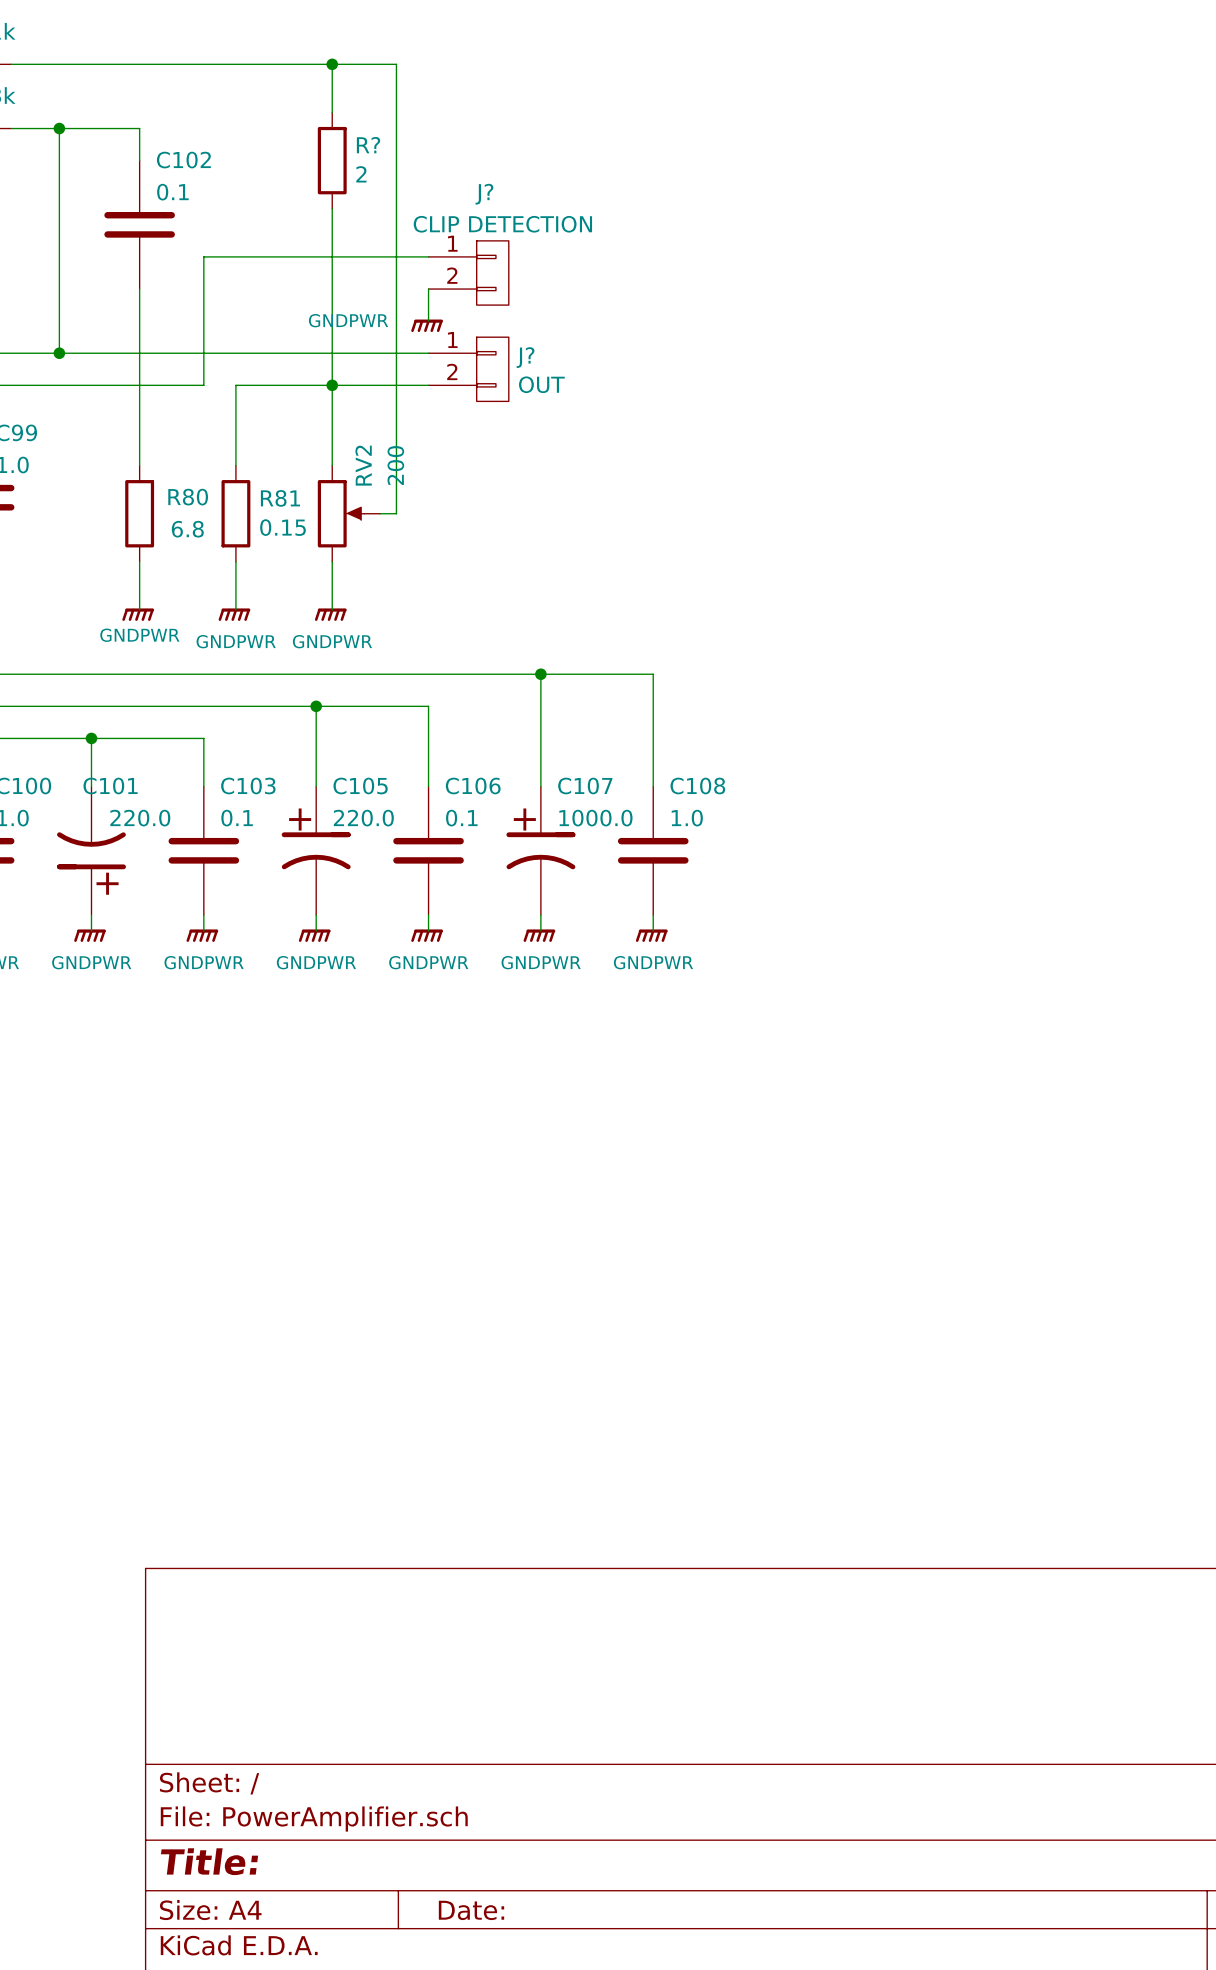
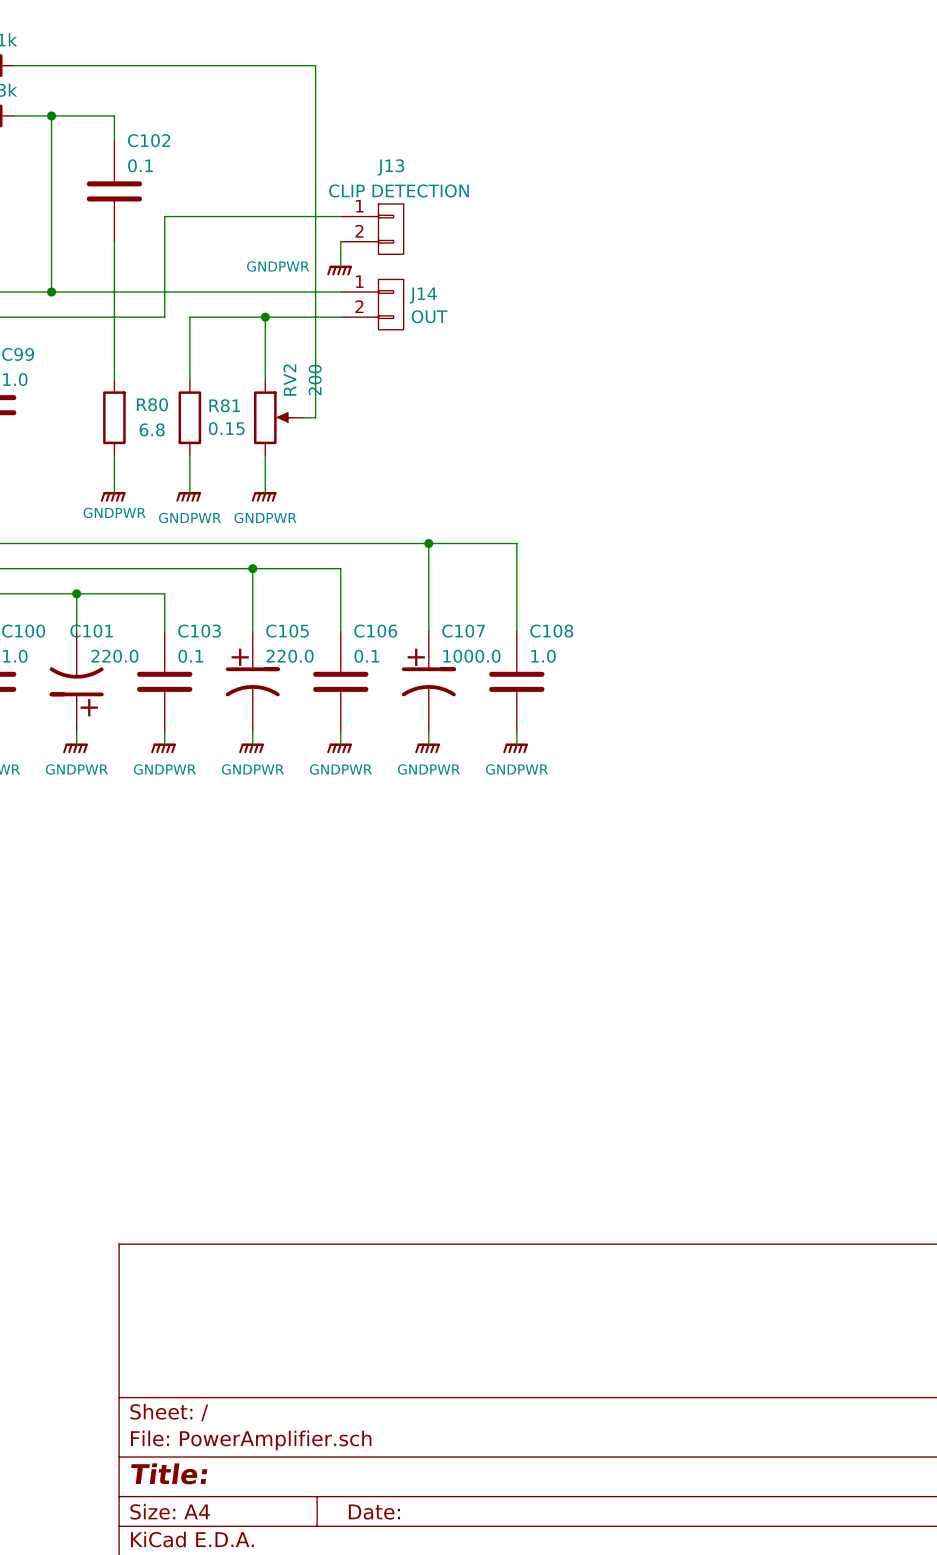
wire: (332, 64) (332, 112) -> none
junction: (332, 64) -> none
R?: 2 (332, 160) -> none
J? name: J? (484, 194) -> J13 (390, 167)
wire: (332, 208) (332, 385) -> none
J? name: J? (525, 357) -> J14 (423, 295)

